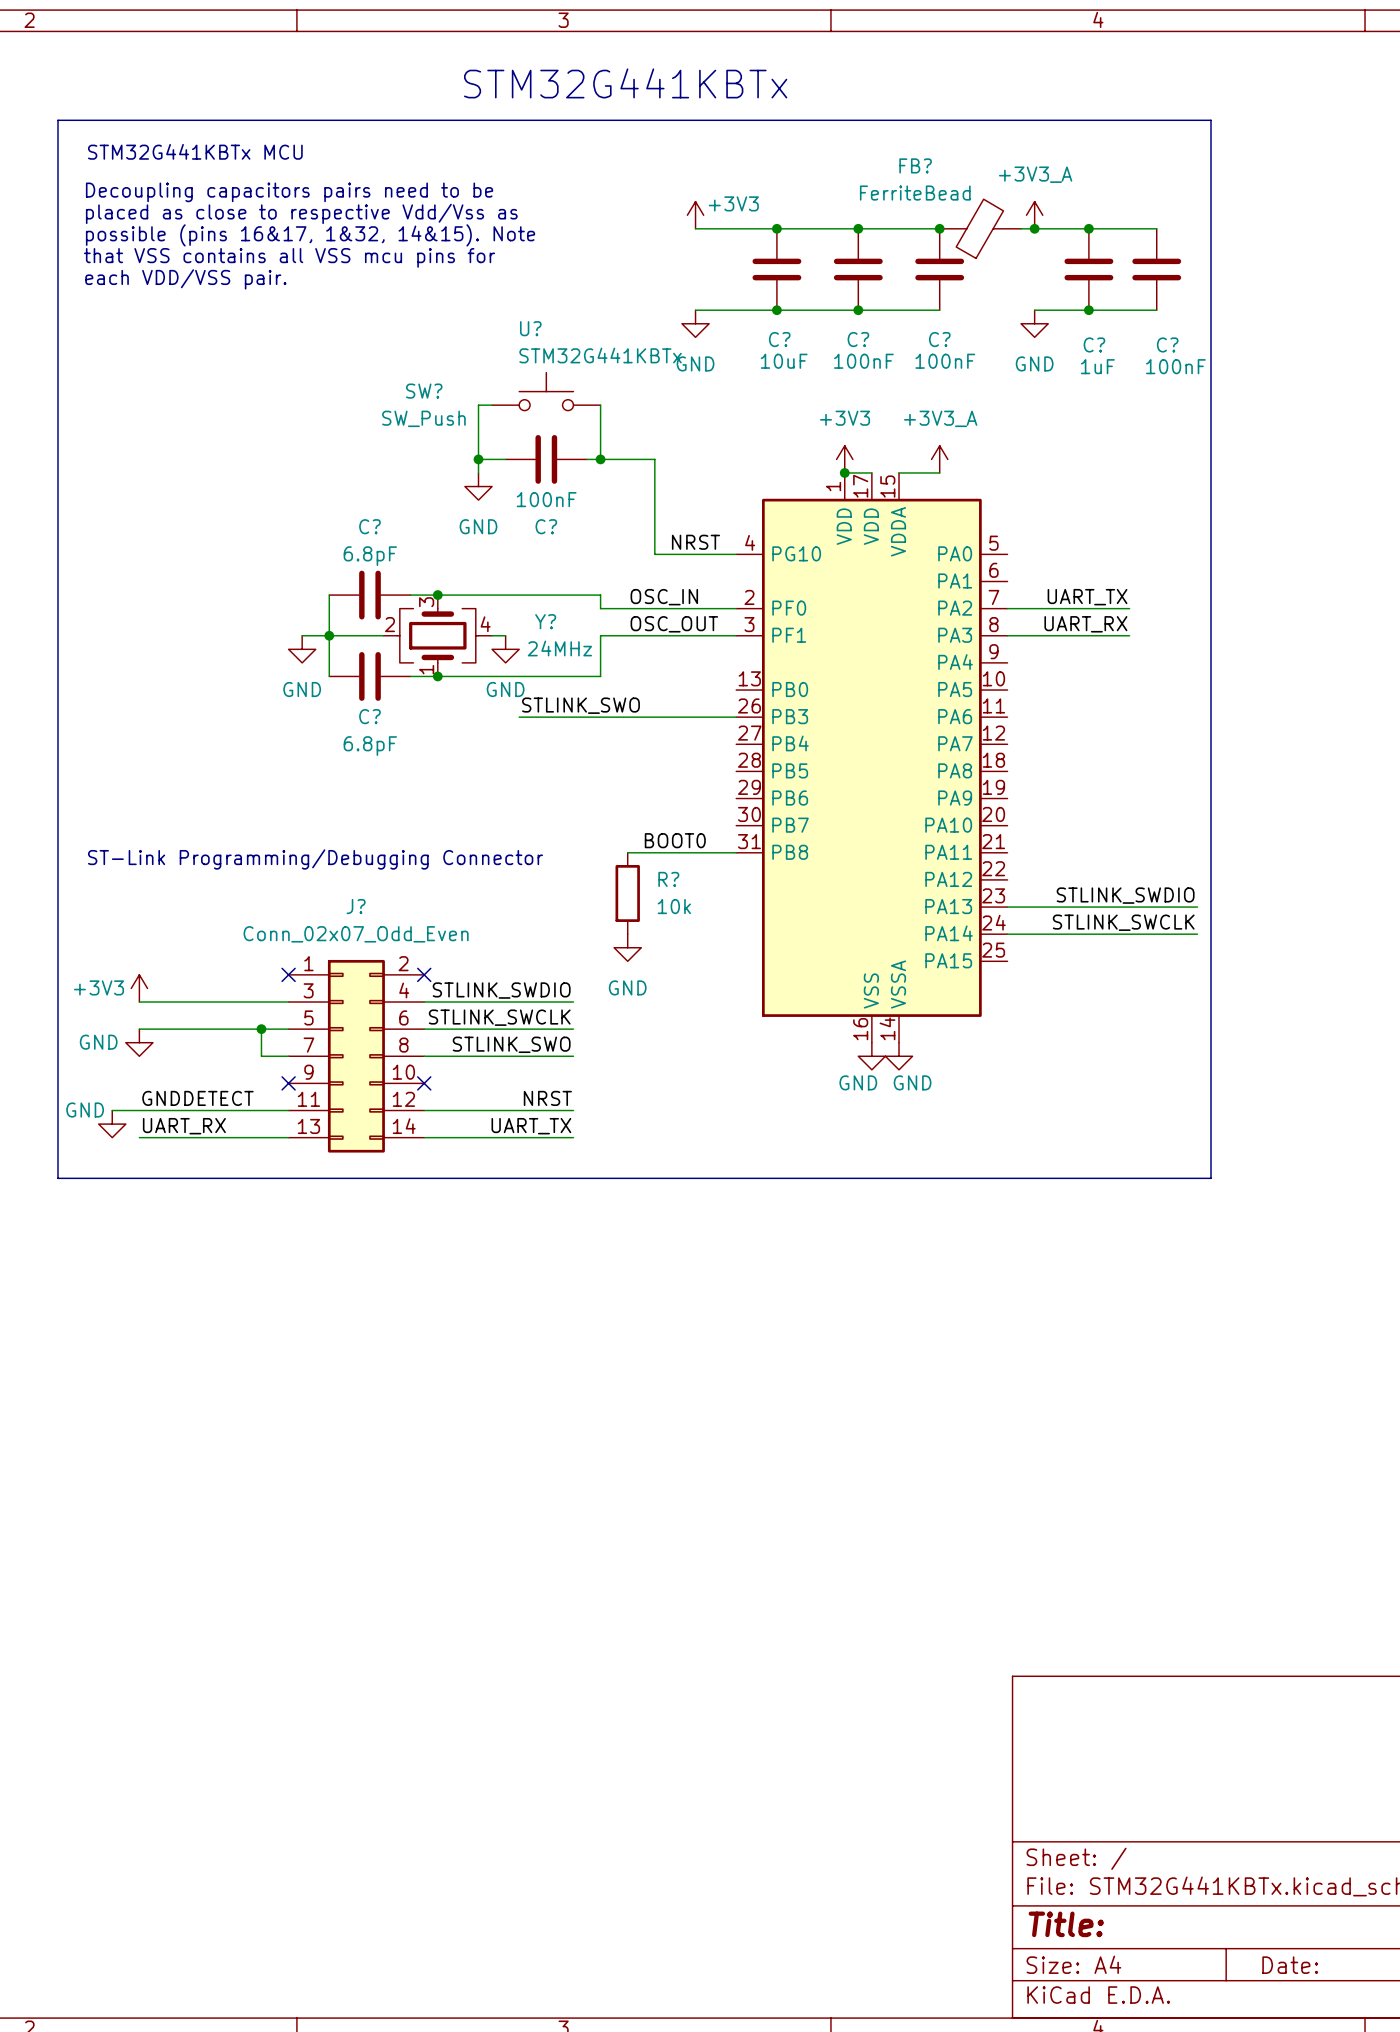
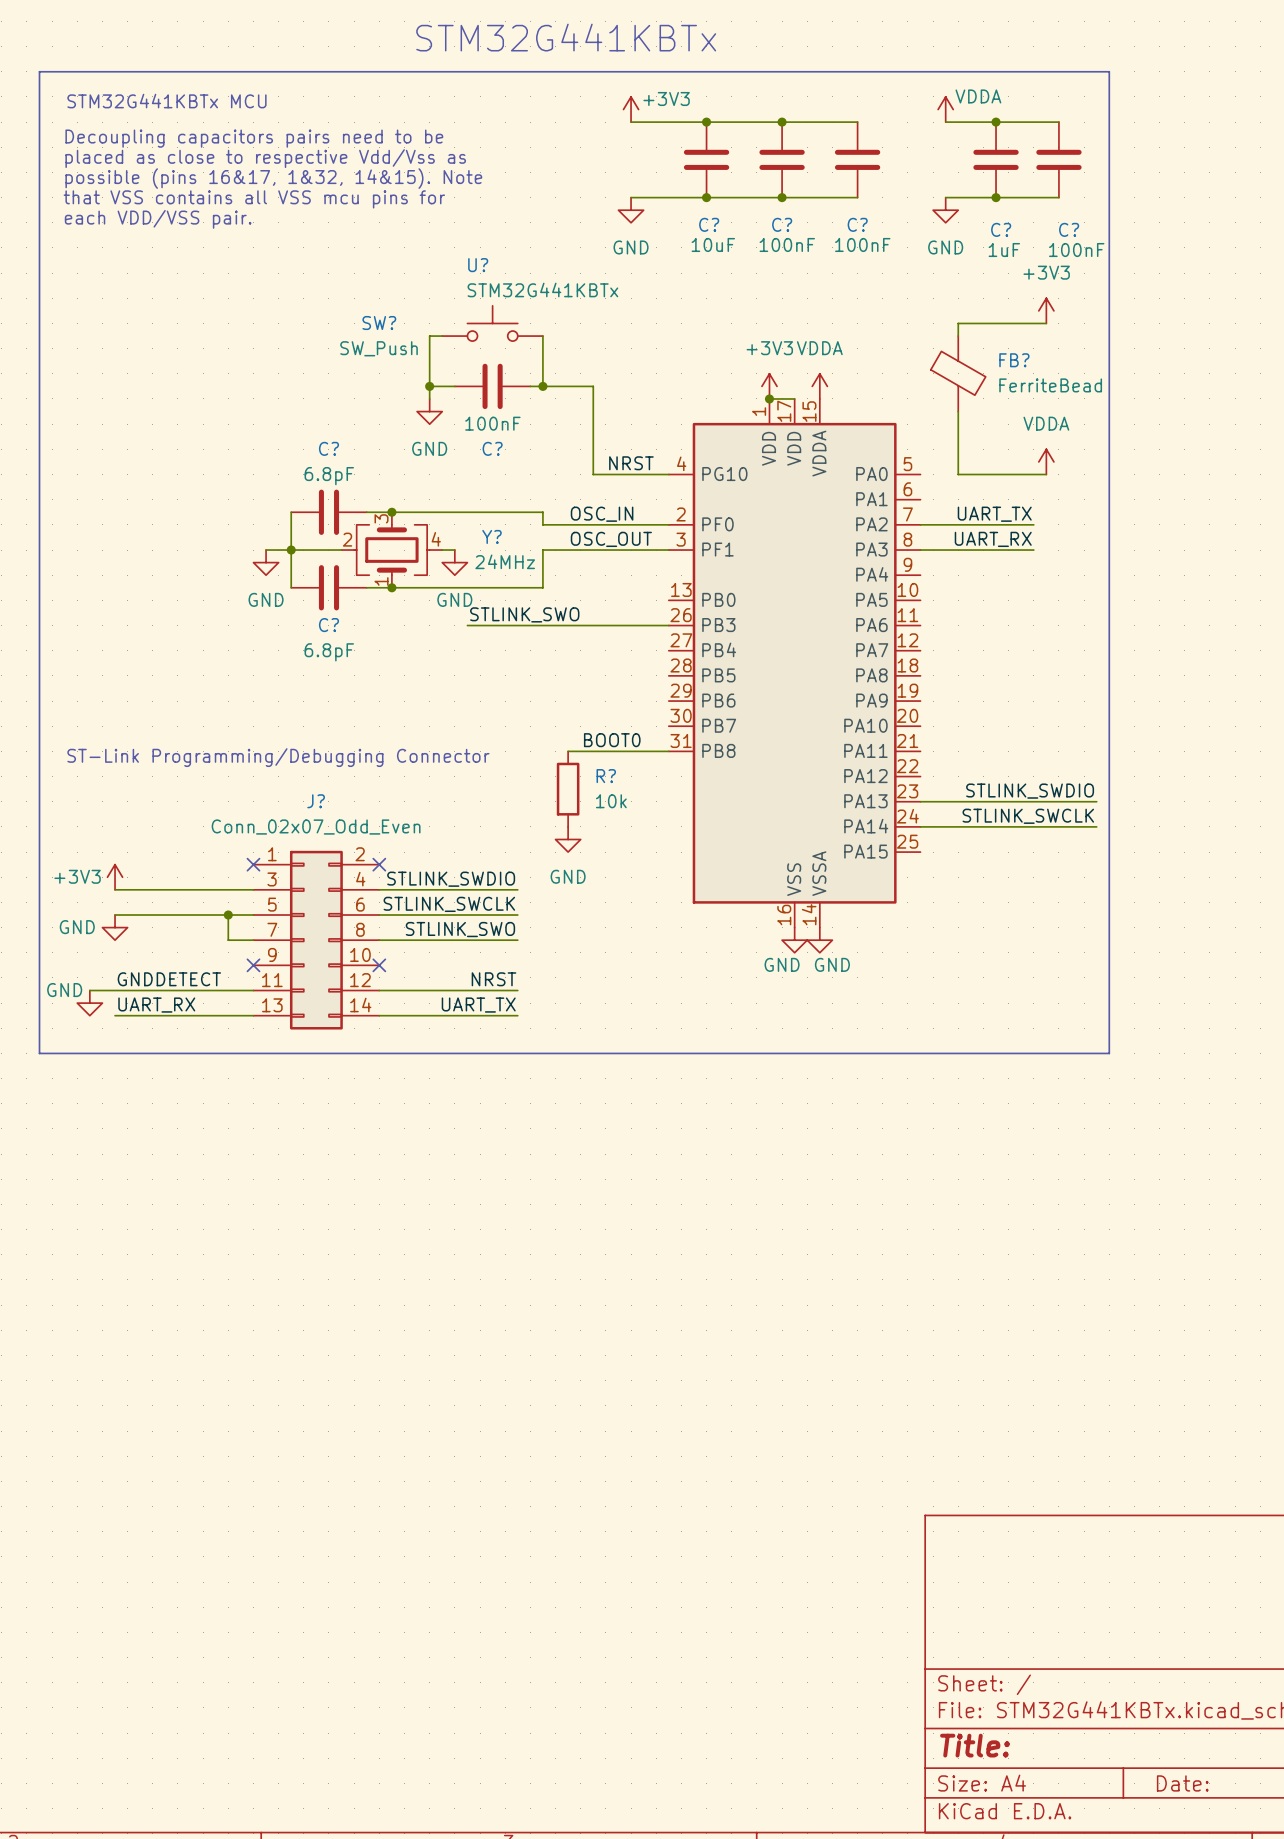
power symbol: none -> VDDA (945, 109)
FB? name position: FB? (915, 165) -> FB? (1014, 360)
junction: none -> (706, 122)
junction: none -> (782, 122)
wire: none -> (945, 122) (1058, 122)
junction: none -> (996, 122)
FB? value position: FerriteBead (915, 193) -> FerriteBead (1050, 385)
power symbol position: +3V3 (695, 215) -> +3V3 (631, 109)
C?: none -> 100nF (782, 159)
C?: none -> 100nF (857, 159)
power symbol: +3V3_A (1034, 215) -> none
wire: (695, 228) (939, 228) -> (631, 122) (857, 122)
junction: (776, 228) -> none
junction: (858, 228) -> none
junction: (939, 228) -> none
FB? rotation: 0° (979, 228) -> 90° clockwise (958, 373)
FB? position: (980, 228) -> (958, 373)
wire: (1021, 228) (1156, 228) -> none
junction: (1034, 228) -> none
junction: (1088, 228) -> none
junction: none -> (706, 197)
junction: none -> (782, 197)
junction: none -> (996, 197)
C? position: (776, 269) -> (706, 159)
C?: 100nF (858, 269) -> none
C?: 100nF (939, 269) -> none
C? position: (1088, 269) -> (996, 159)
C? position: (1156, 269) -> (1058, 159)
wire: (695, 310) (939, 310) -> (631, 197) (857, 197)
junction: (776, 310) -> none
junction: (858, 310) -> none
wire: (1034, 310) (1156, 310) -> (945, 197) (1058, 197)
junction: (1088, 310) -> none
power symbol position: GND (695, 323) -> GND (631, 210)
power symbol position: GND (1034, 323) -> GND (945, 210)
power symbol: none -> +3V3 (1046, 310)
wire: none -> (1046, 323) (958, 323) (958, 336)
power symbol: none -> VDDA (819, 386)
power symbol: +3V3_A (939, 459) -> none
wire: (899, 472) (939, 472) -> none
wire: none -> (958, 411) (958, 474) (1046, 474)
power symbol: none -> VDDA (1046, 461)

